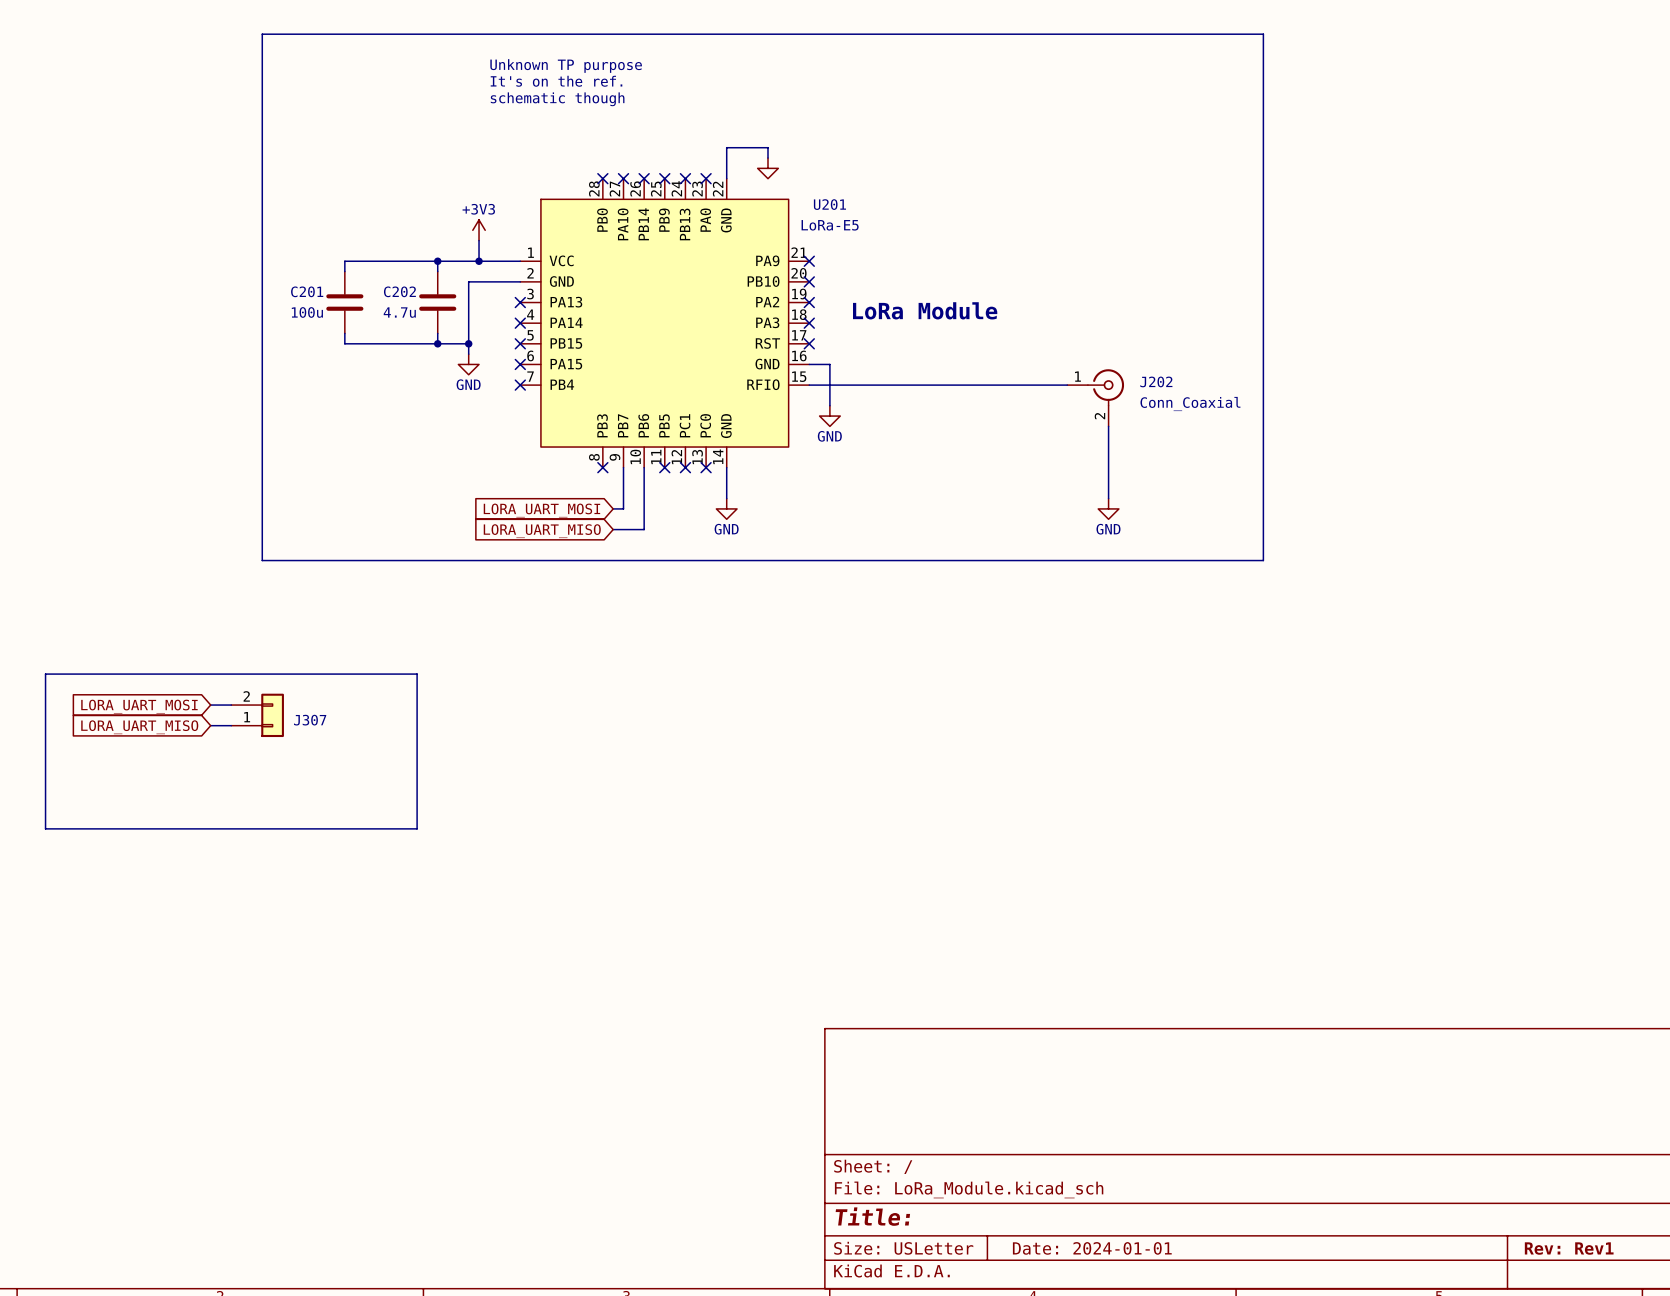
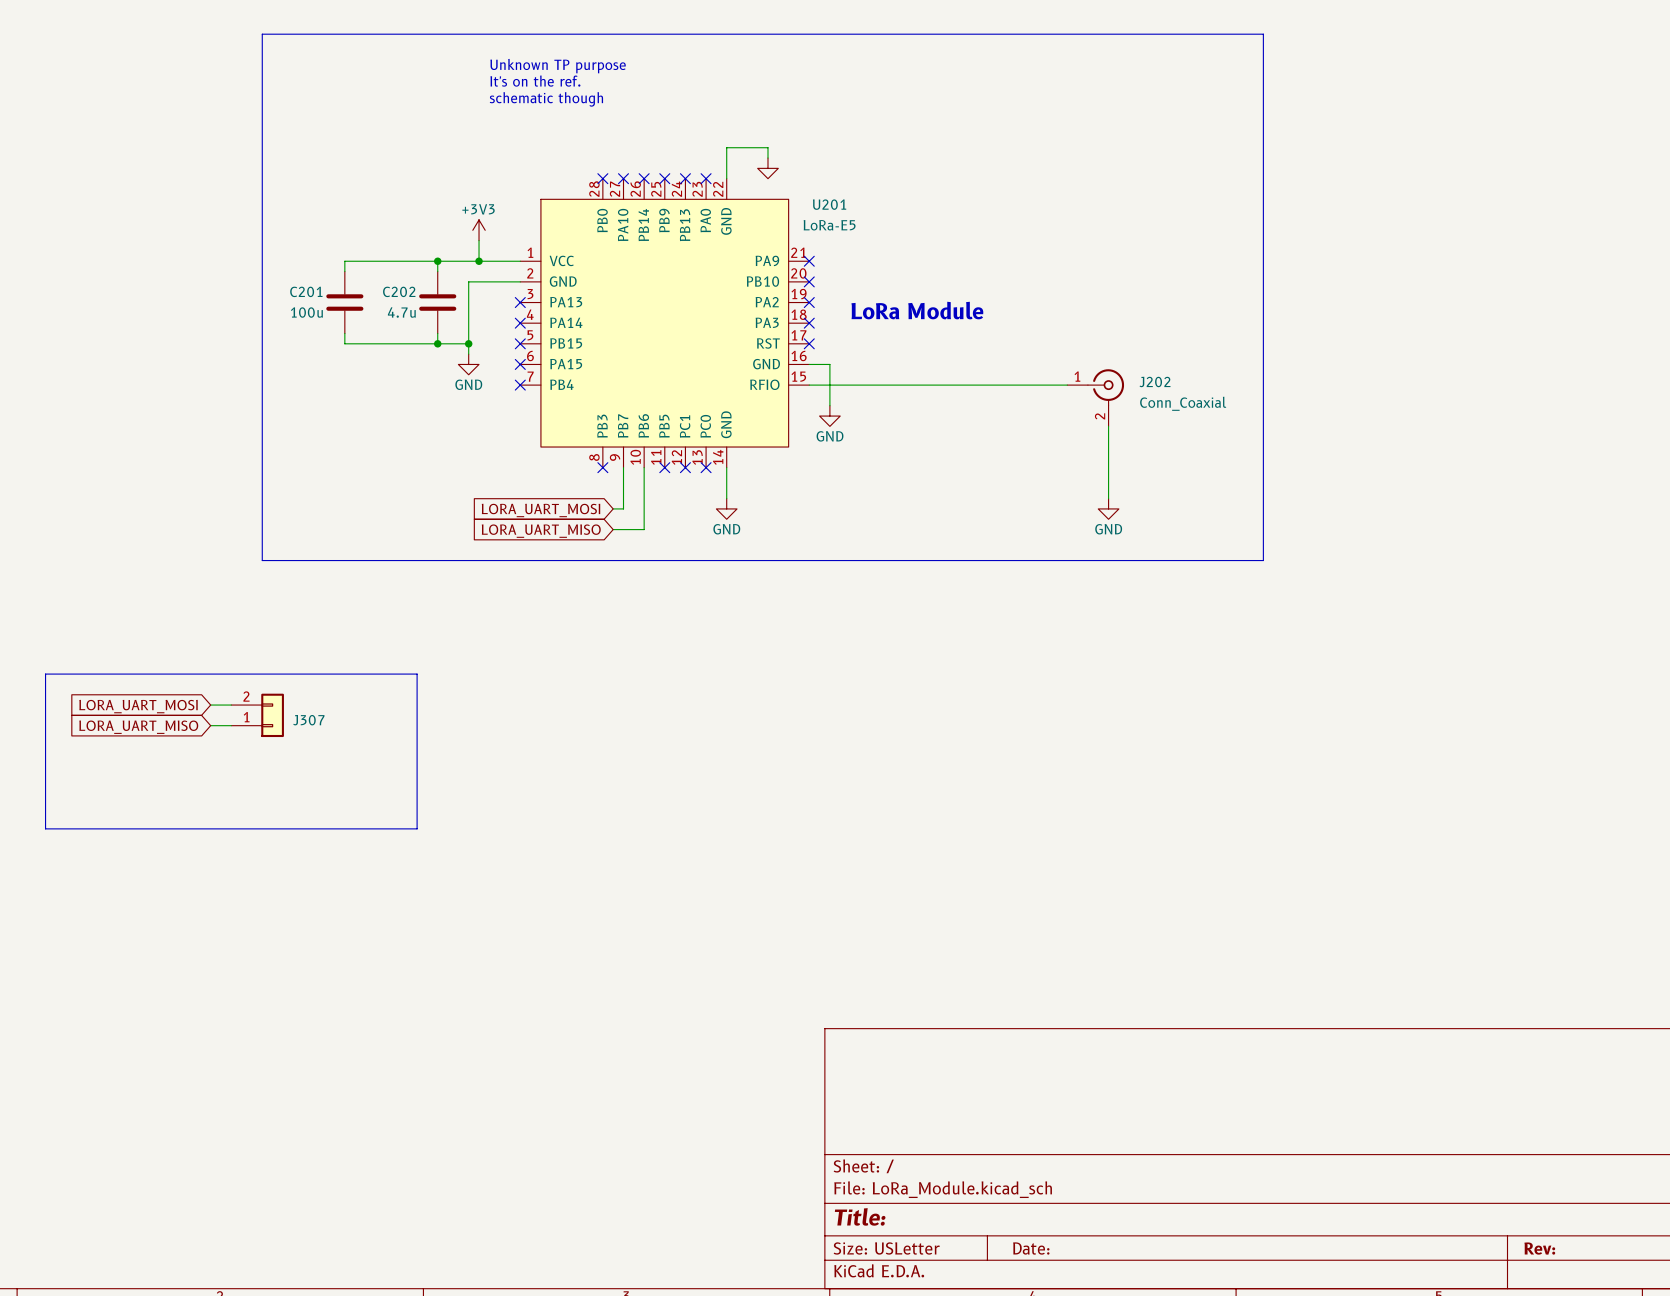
title block: Date: 2024-01-01 (1092, 1248) -> Date: (1031, 1248)
title block: Rev: Rev1 (1569, 1248) -> Rev: (1539, 1248)

